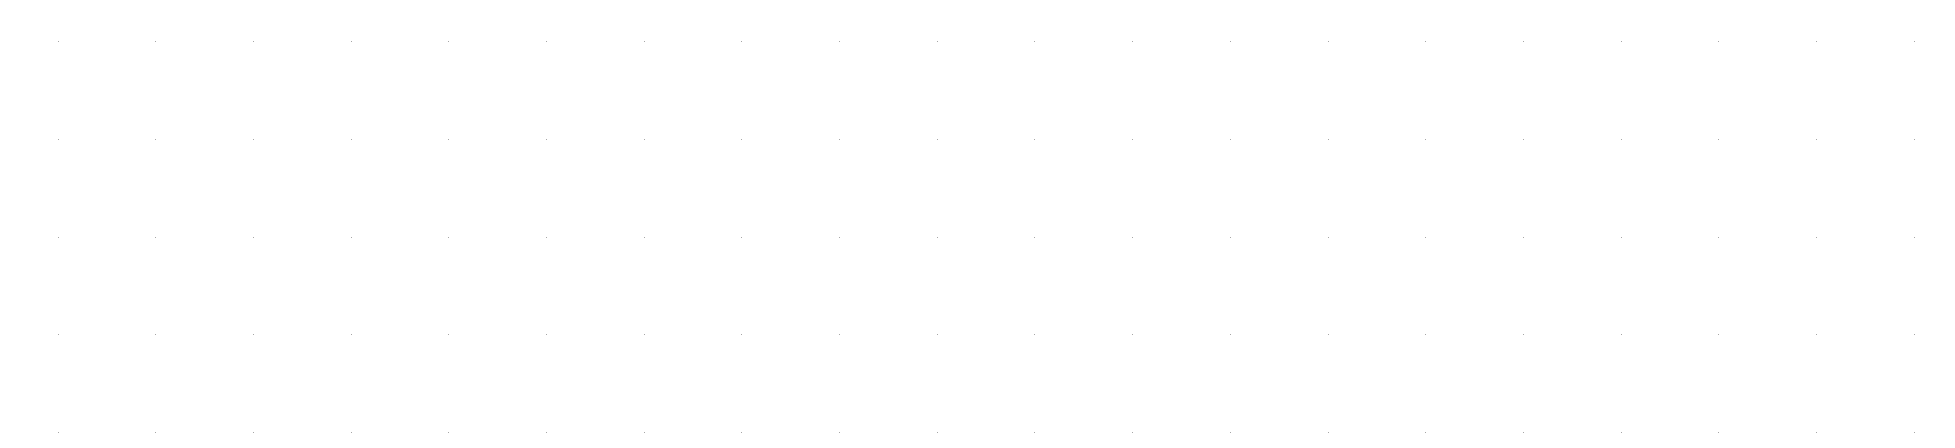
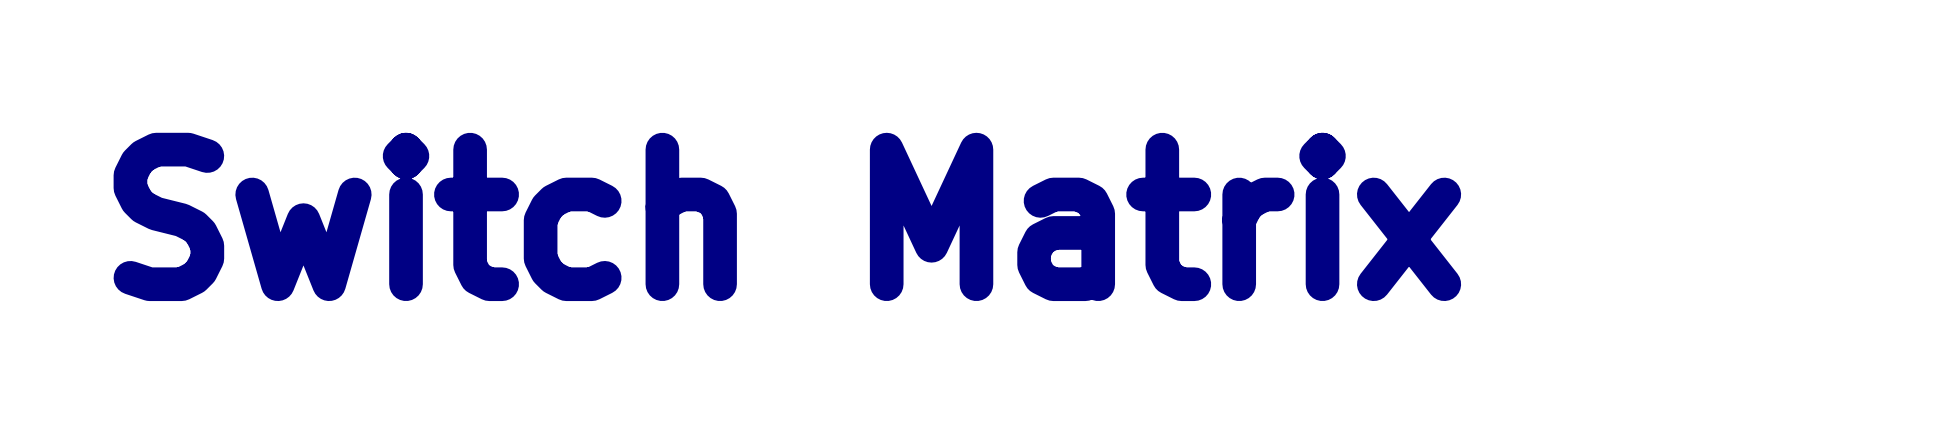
text: none -> Switch Matrix (787, 216)

